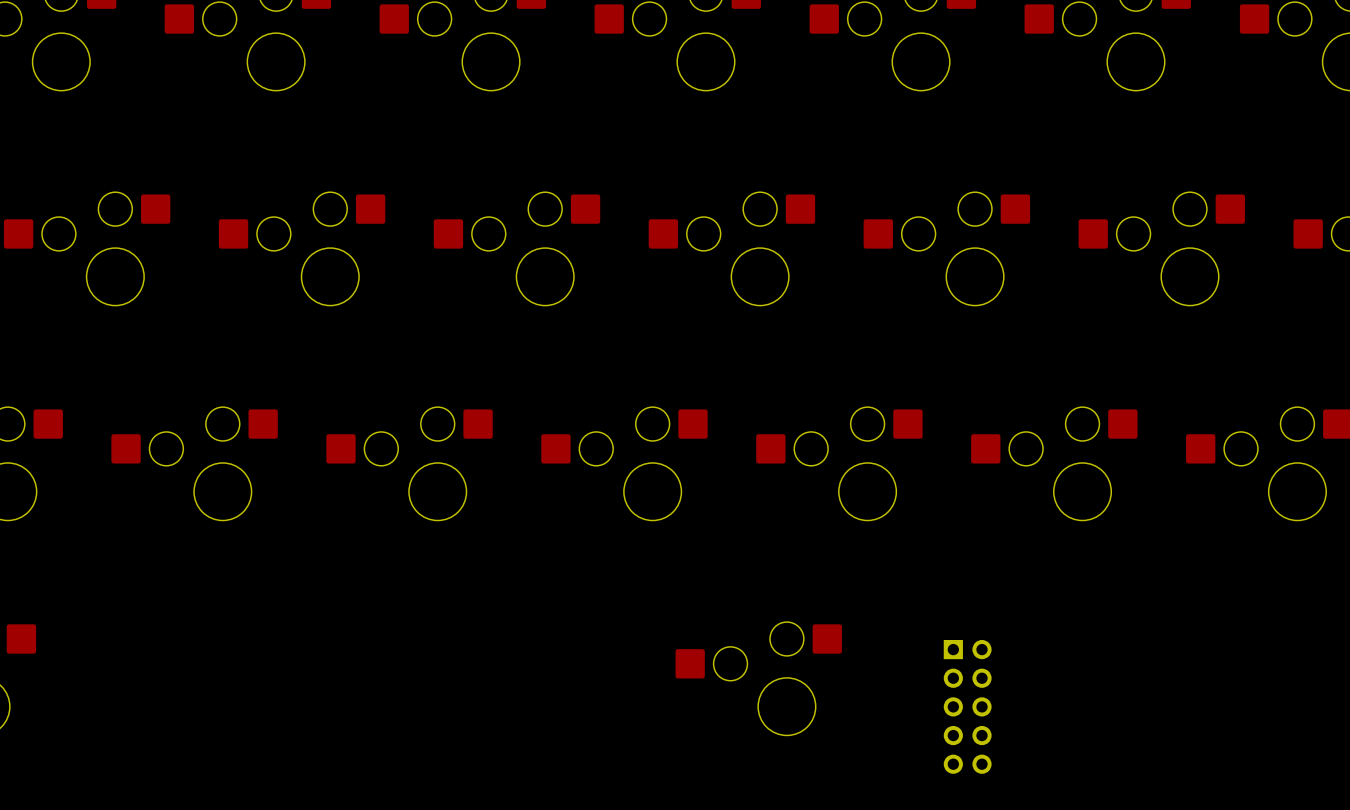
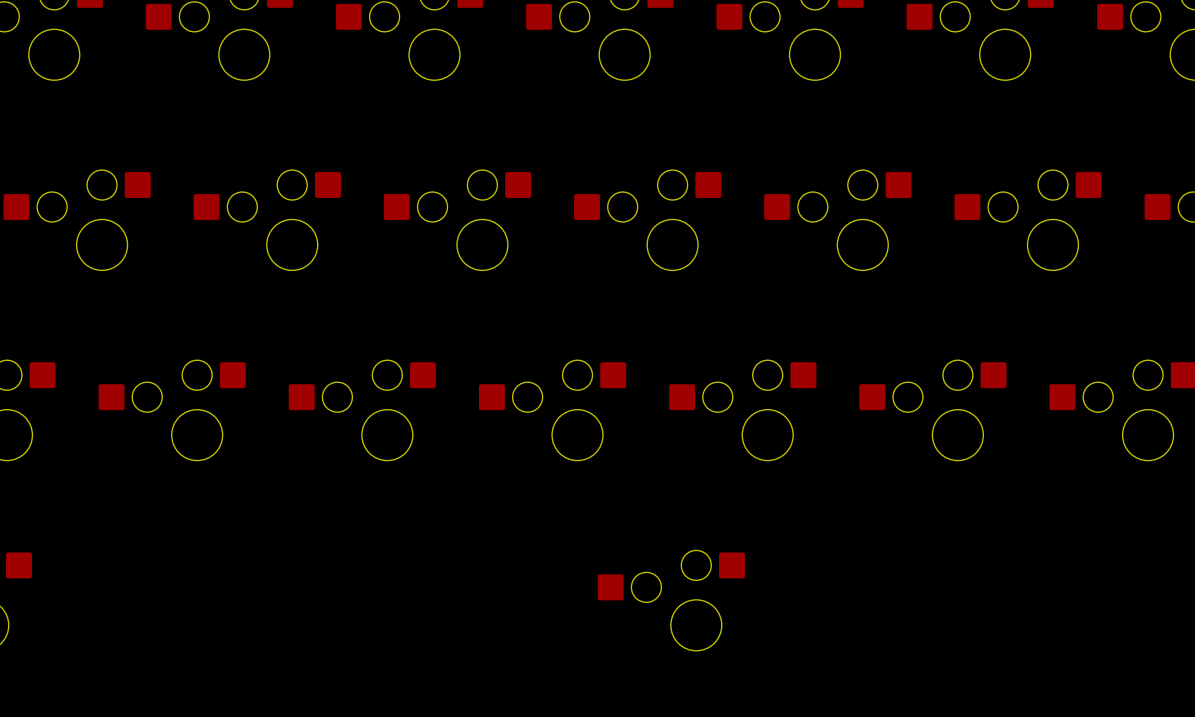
part: (967, 706) -> none

